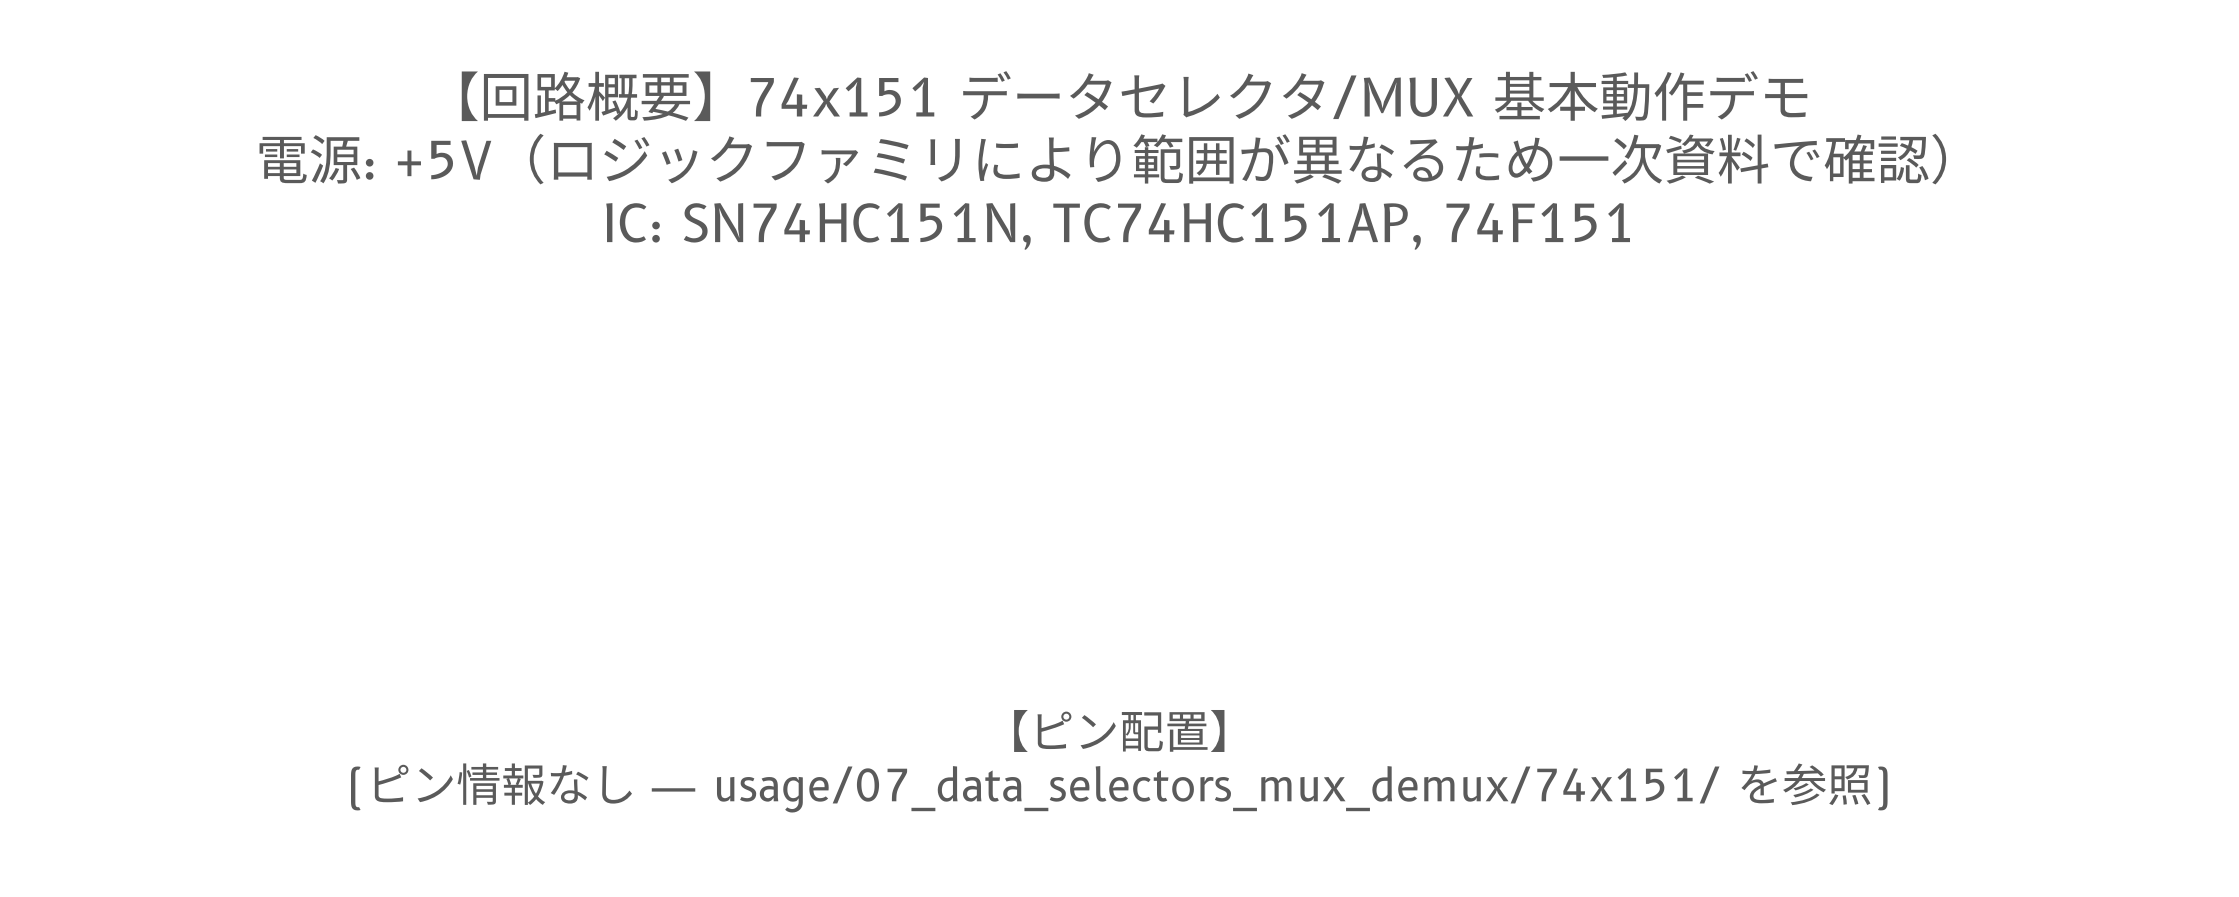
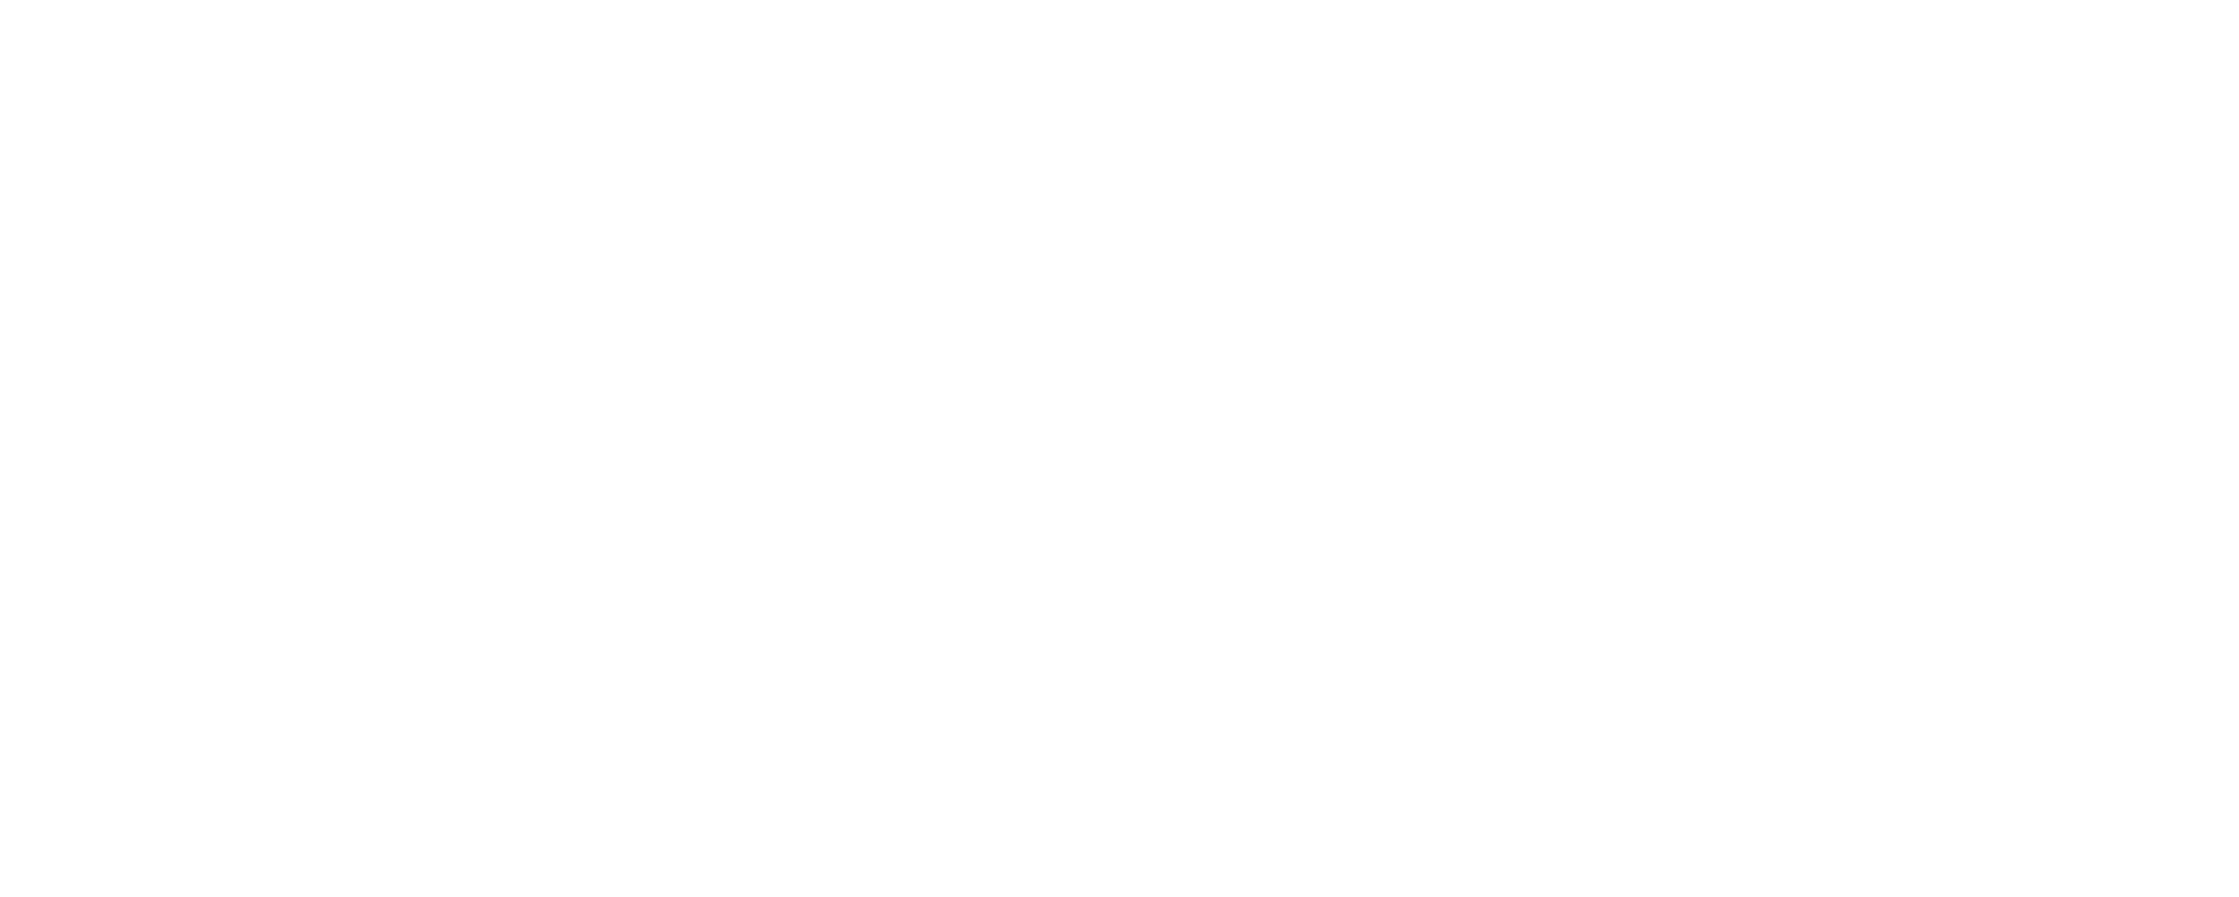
text: 【回路概要】74x151 データセレクタ/MUX 基本動作デモ (1134, 96) -> none
text: 電源: +5V（ロジックファミリにより範囲が異なるため一次資料で確認） (1102, 159) -> none
text: IC: SN74HC151N, TC74HC151AP, 74F151 (1118, 226) -> none
text: 【ピン配置】 (1119, 730) -> none
text: (ピン情報なし — usage/07_data_selectors_mux_demux/74x151/ を参照) (1119, 787) -> none

